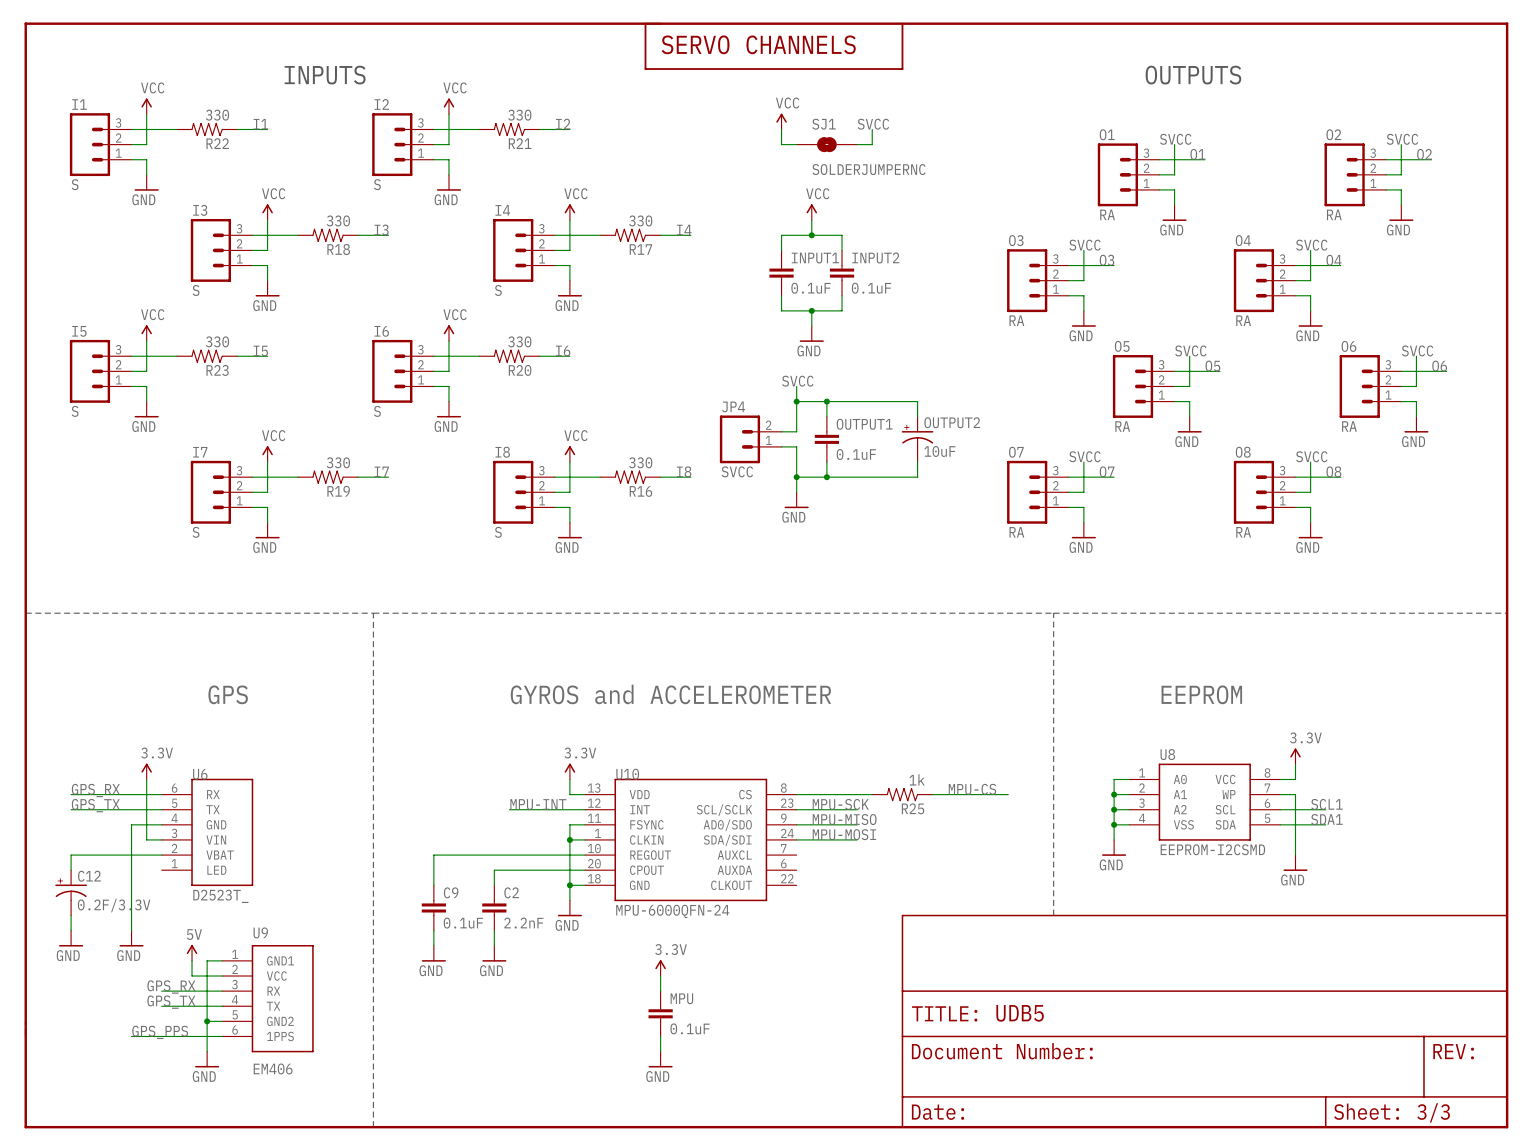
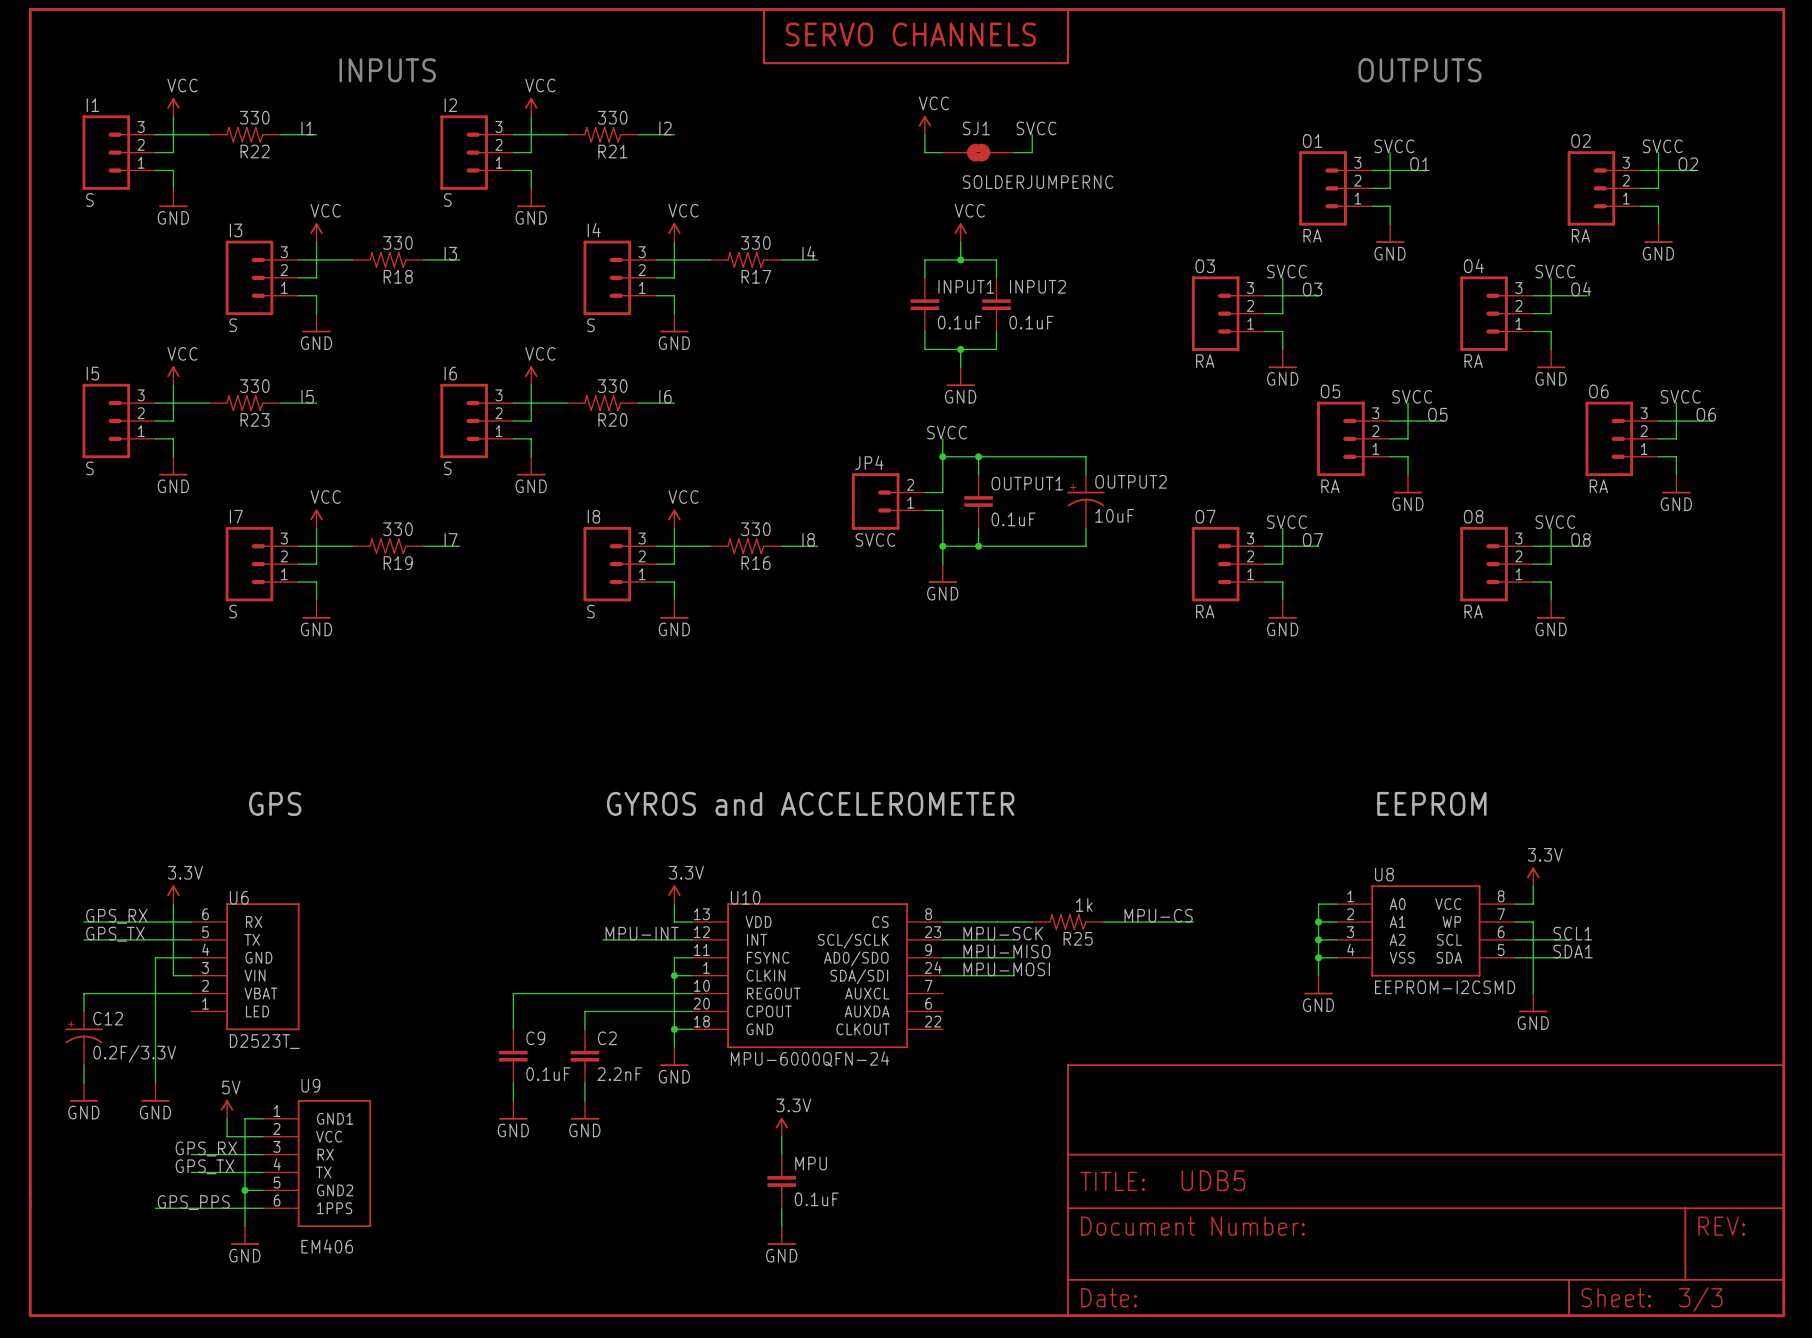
line: (25, 613) (1507, 613) -> none
line: (373, 613) (373, 1127) (358, 1127) -> none
line: (1053, 613) (1053, 915) -> none

